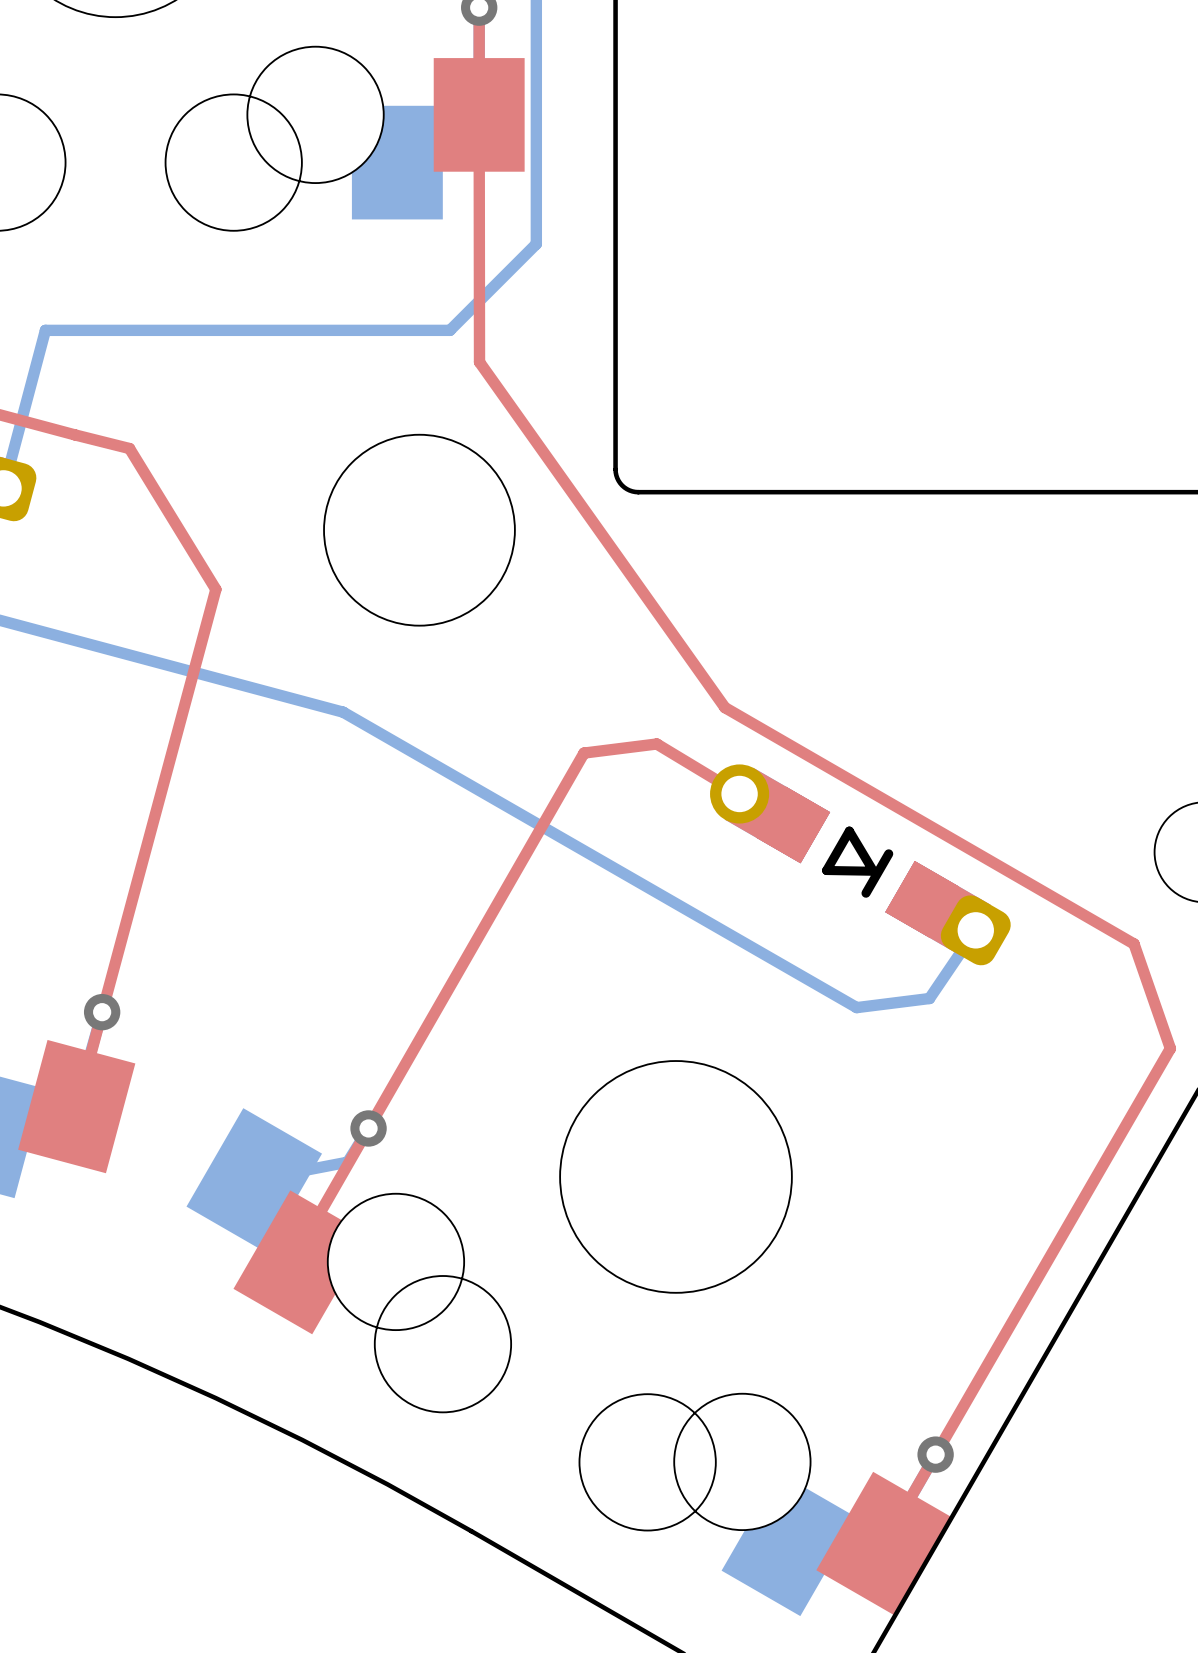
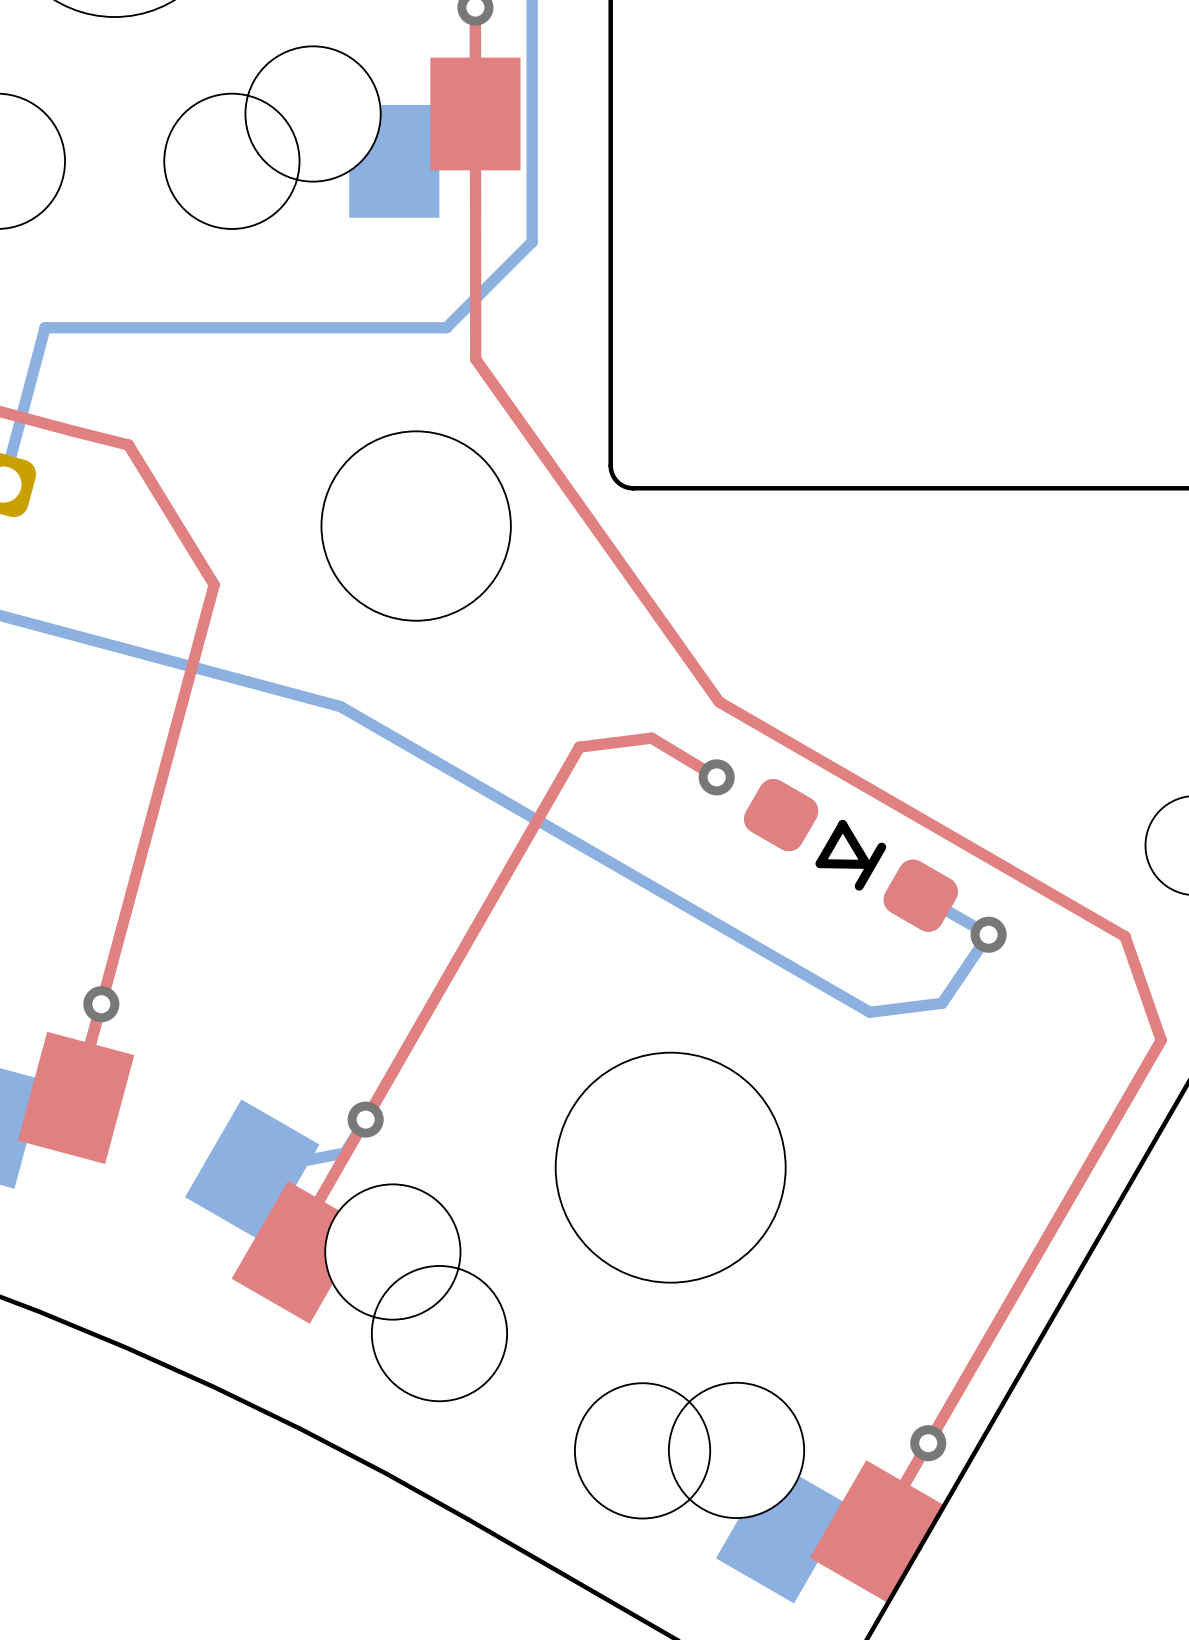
bottom track: (343, 712) (856, 1007) (929, 998) (975, 930) -> (340, 706) (870, 1012) (942, 1003) (988, 934) (920, 895)
top track: (656, 743) (739, 793) -> (651, 738) (716, 777)
part footprint: [710, 764, 1011, 966] -> [744, 778, 958, 932]
via: none -> (716, 777)
via: none -> (988, 934)

